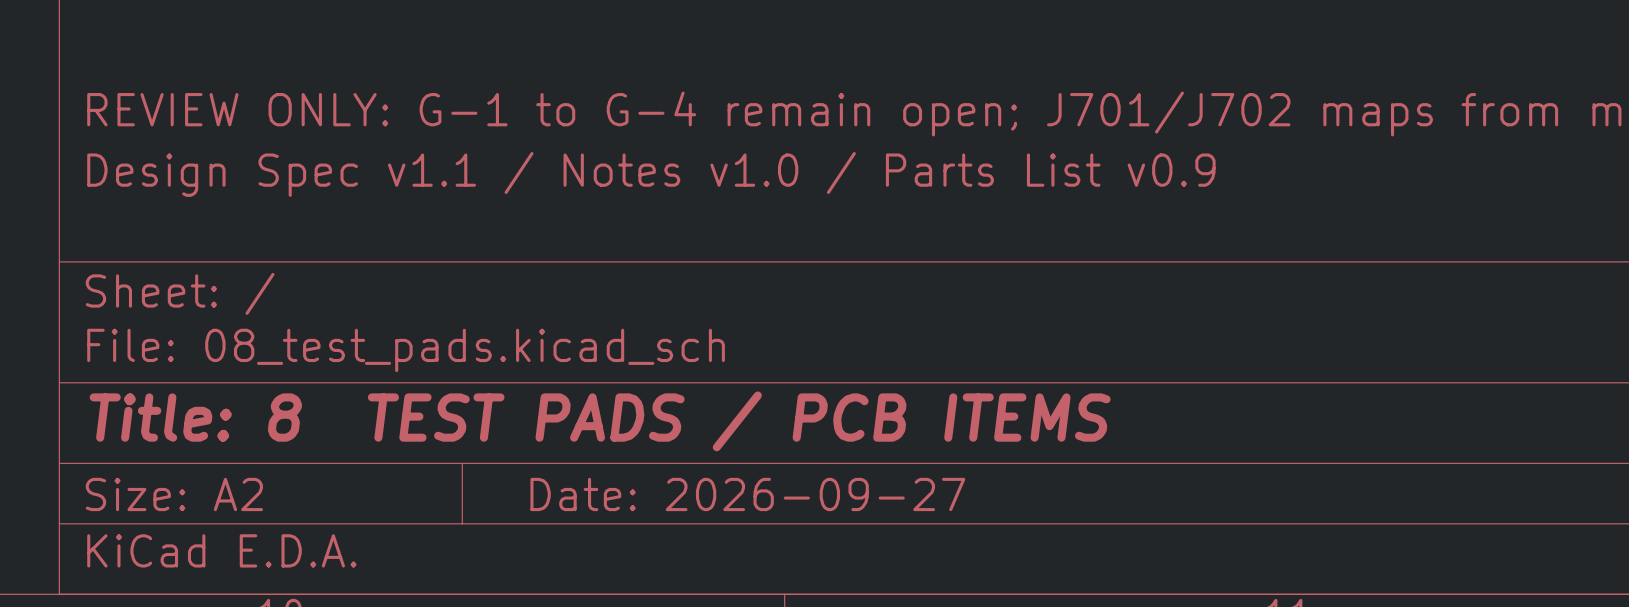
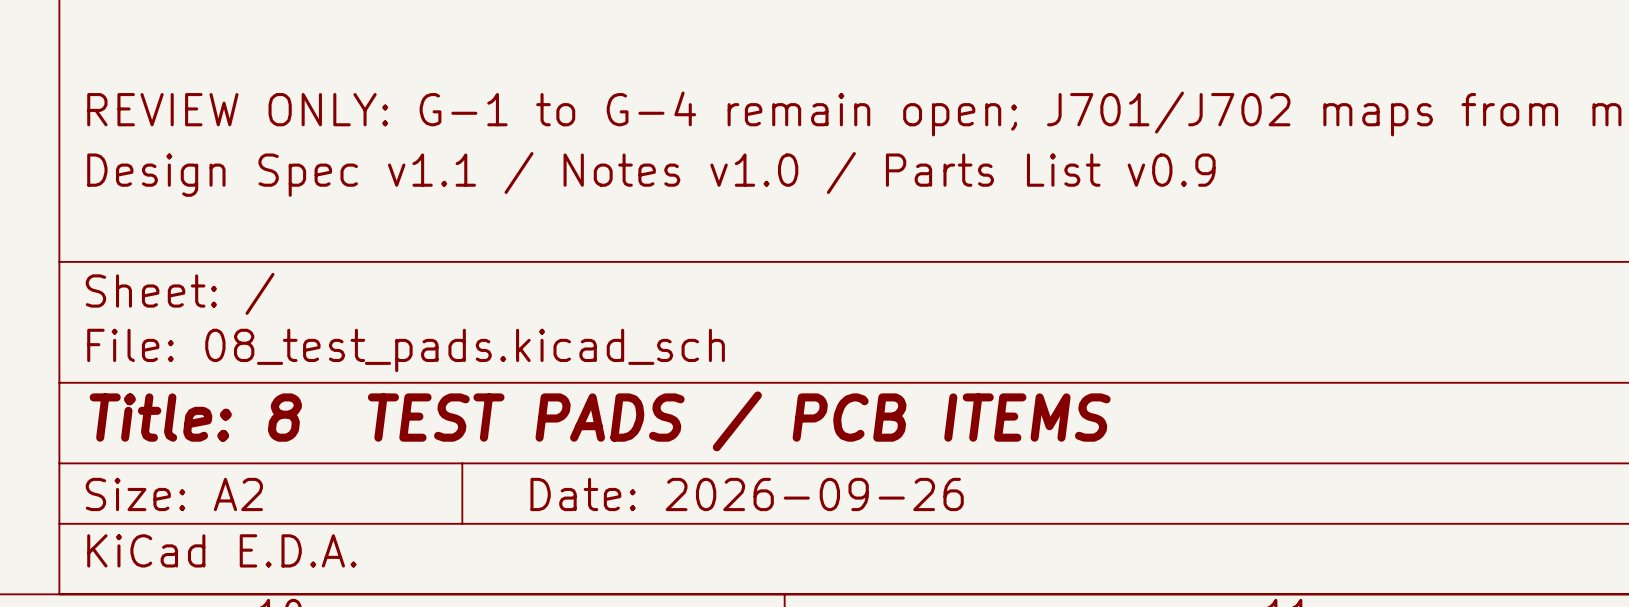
title block: Date: 2026-09-27 (747, 494) -> Date: 2026-09-26 (747, 494)

